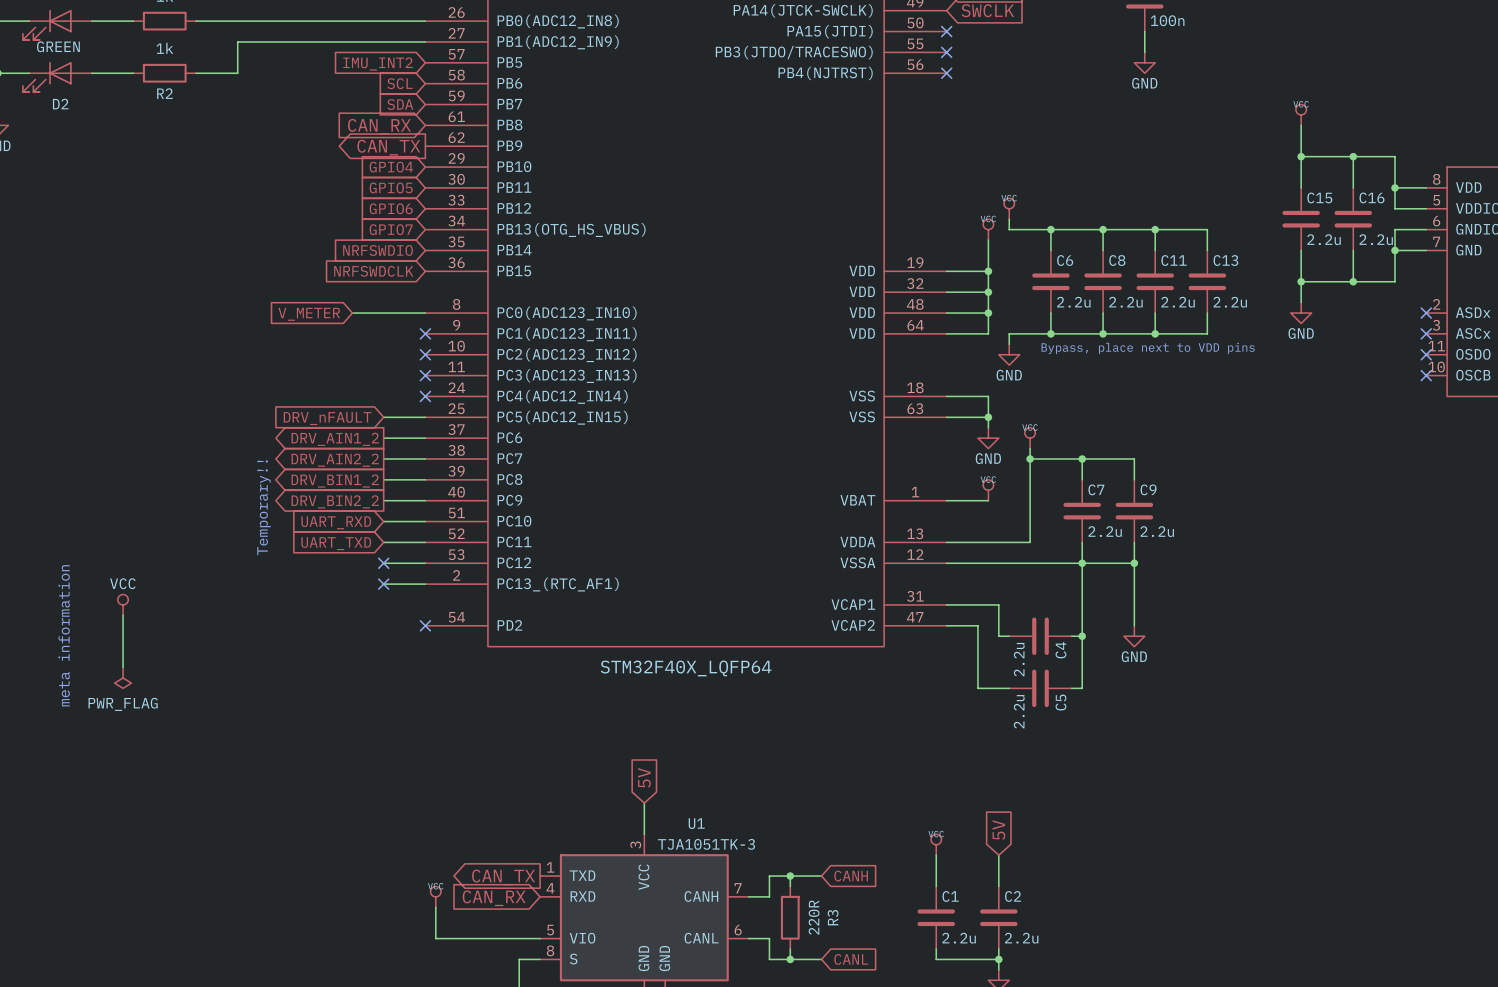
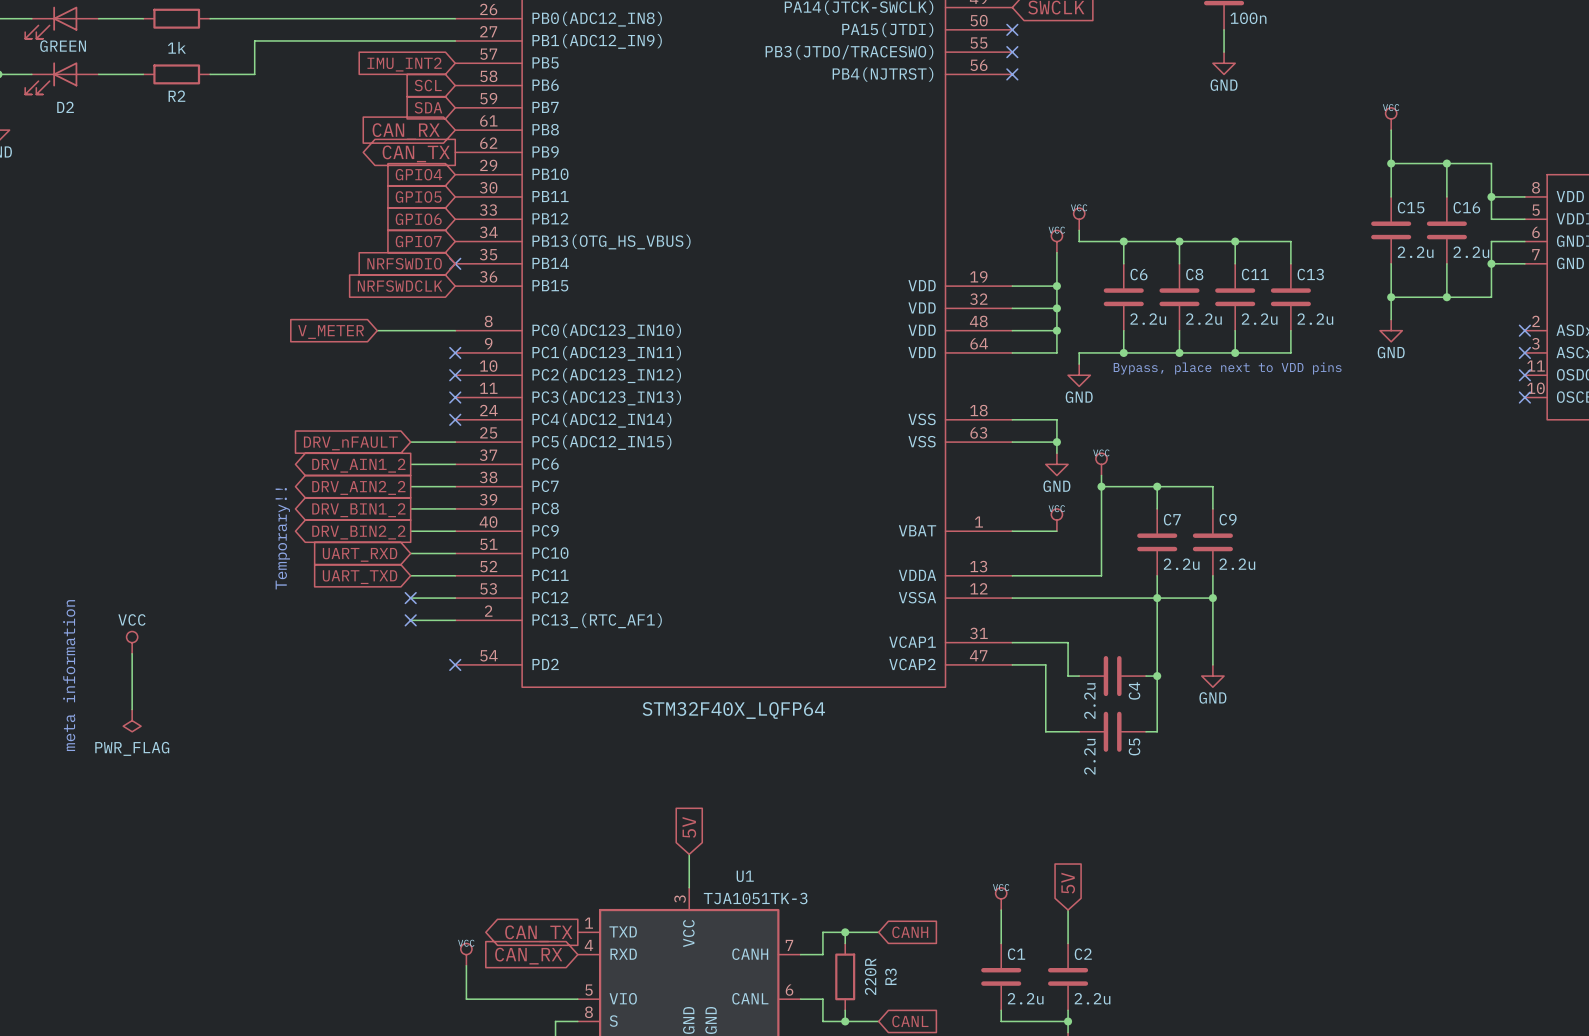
no-connect mark: none -> (455, 263)

